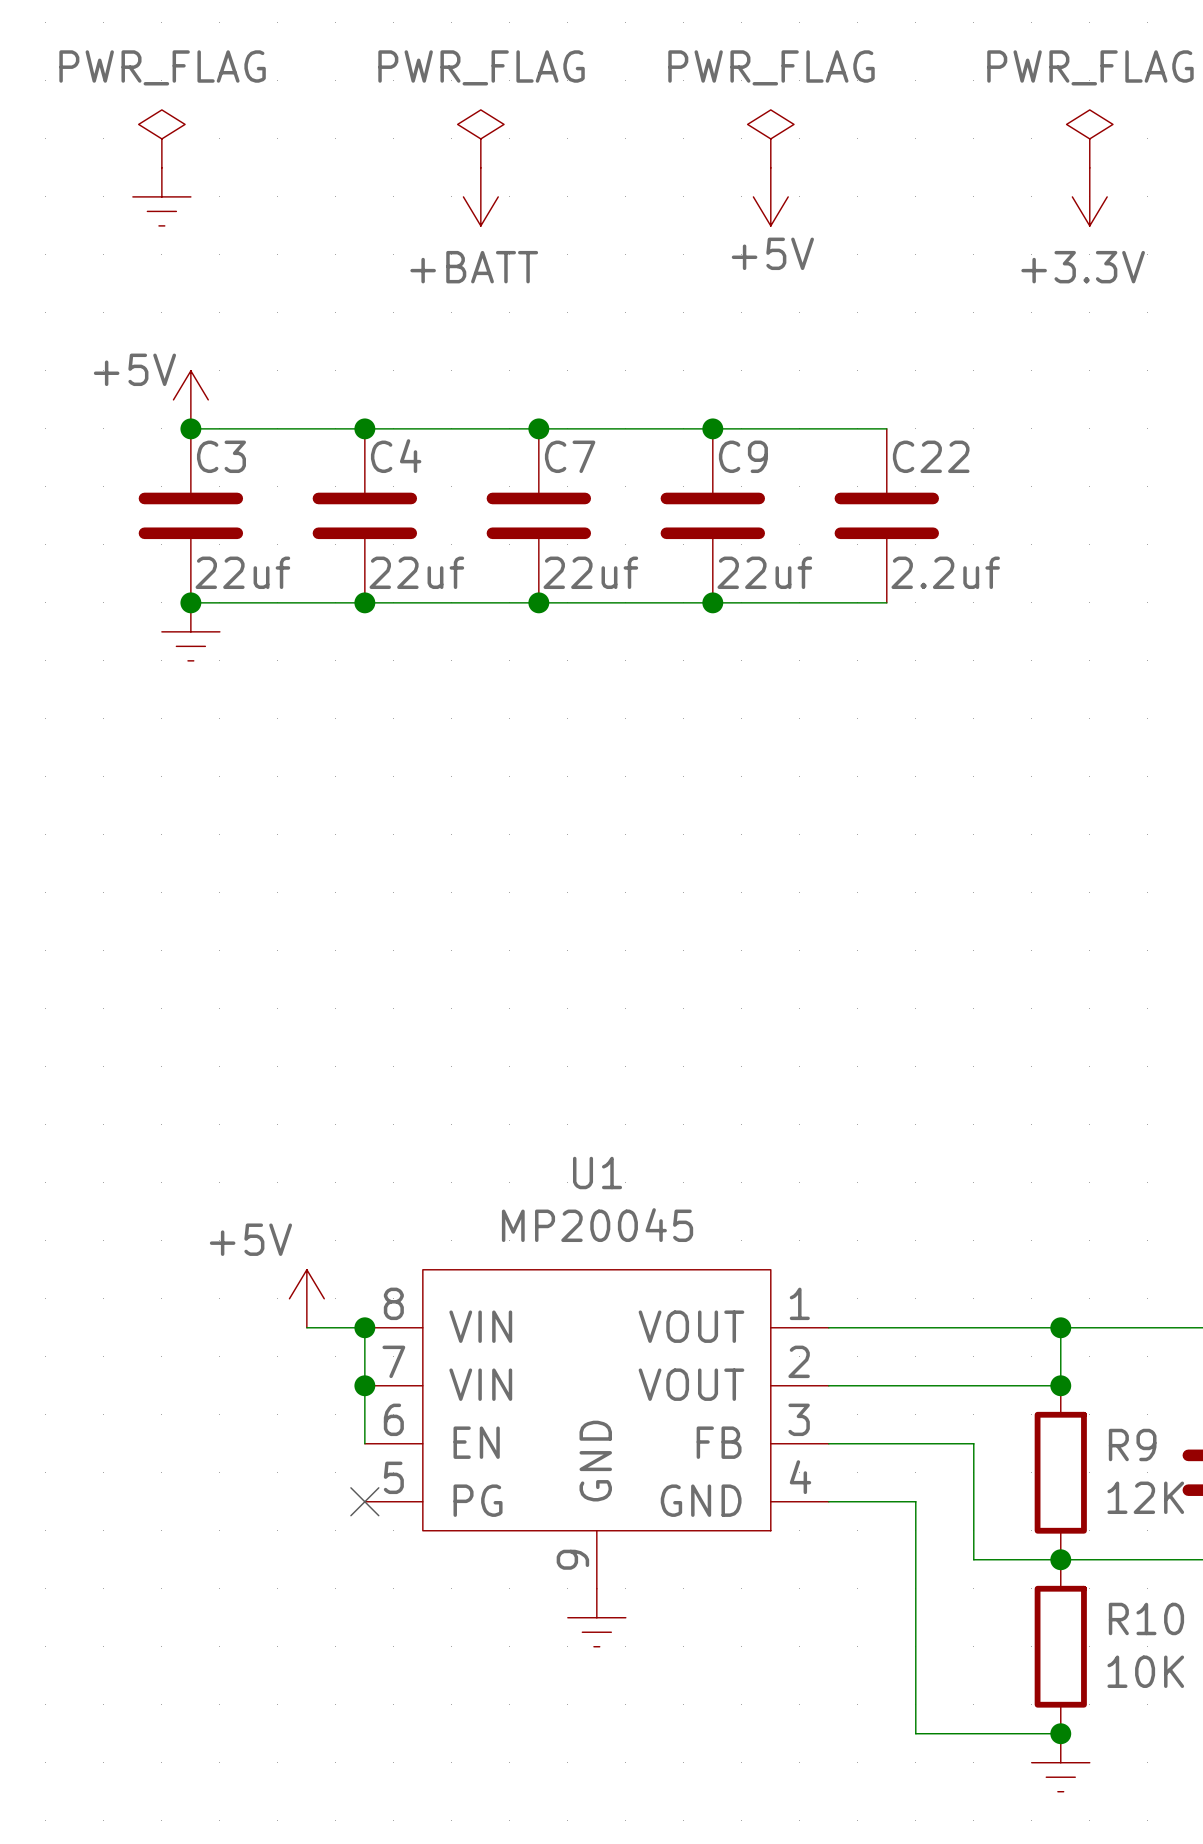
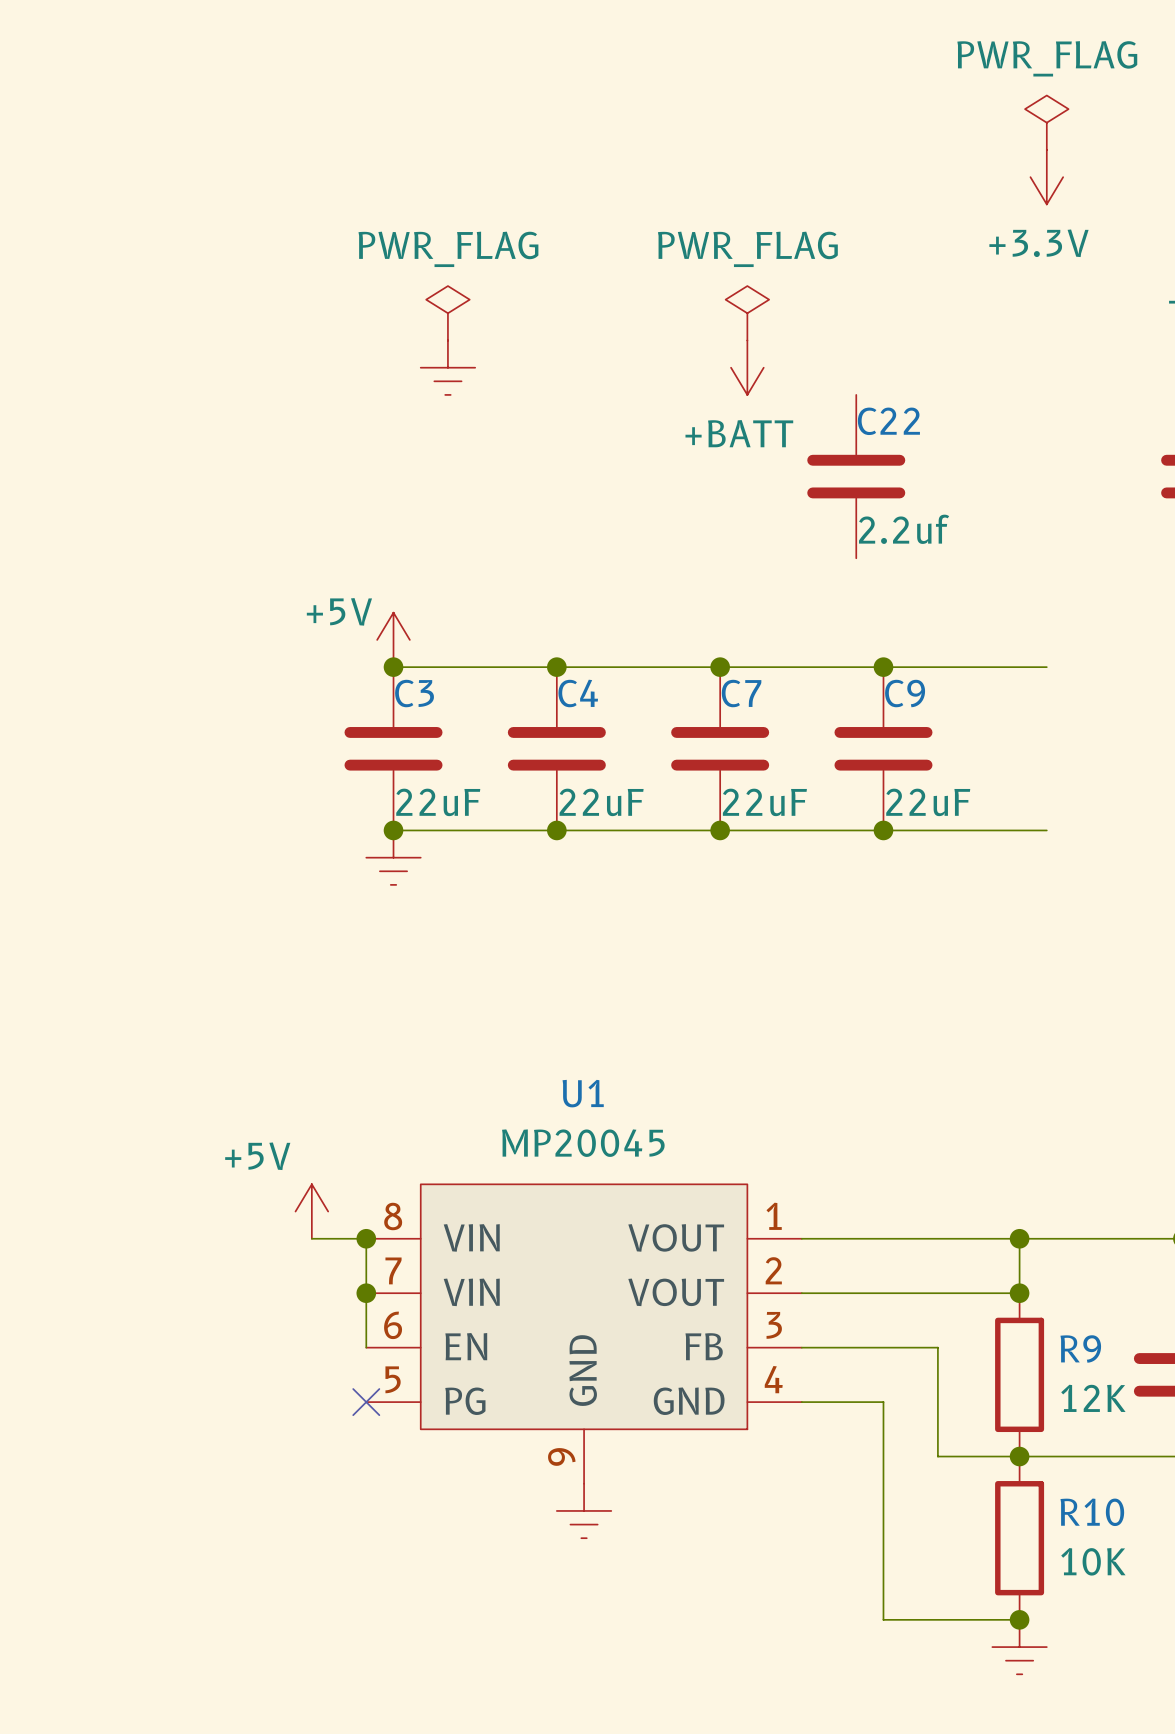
power symbol: PWR_FLAG (161, 138) -> none
power symbol: PWR_FLAG (480, 138) -> none
power symbol: PWR_FLAG (770, 138) -> none
power symbol: (161, 196) -> none
power symbol position: +BATT (480, 196) -> +BATT (747, 367)
power symbol: +5V (770, 196) -> none
power symbol: none -> PWR_FLAG (447, 313)
power symbol: none -> PWR_FLAG (747, 313)
power symbol: +5V (190, 399) -> none
power symbol: none -> (447, 367)
wire: (190, 428) (886, 428) -> (393, 667) (1046, 667)
junction: (190, 428) -> none
junction: (364, 428) -> none
junction: (538, 428) -> none
junction: (712, 428) -> none
C3 position: (190, 515) -> (393, 748)
C4 position: (364, 515) -> (556, 748)
C7 position: (538, 515) -> (720, 748)
C9 position: (712, 515) -> (883, 748)
C3 value: 22uf (242, 572) -> 22uF (438, 802)
C4 value: 22uf (416, 572) -> 22uF (601, 802)
C7 value: 22uf (590, 572) -> 22uF (764, 802)
C9 value: 22uf (764, 572) -> 22uF (928, 802)
wire: (190, 602) (886, 602) -> (393, 830) (1046, 830)
junction: (190, 602) -> none
junction: (364, 602) -> none
junction: (538, 602) -> none
junction: (712, 602) -> none
power symbol: (190, 631) -> none
power symbol: none -> +5V (393, 639)
junction: none -> (393, 667)
junction: none -> (556, 667)
junction: none -> (720, 667)
junction: none -> (883, 667)
junction: none -> (393, 830)
junction: none -> (556, 830)
junction: none -> (720, 830)
junction: none -> (883, 830)
power symbol: none -> (393, 857)

